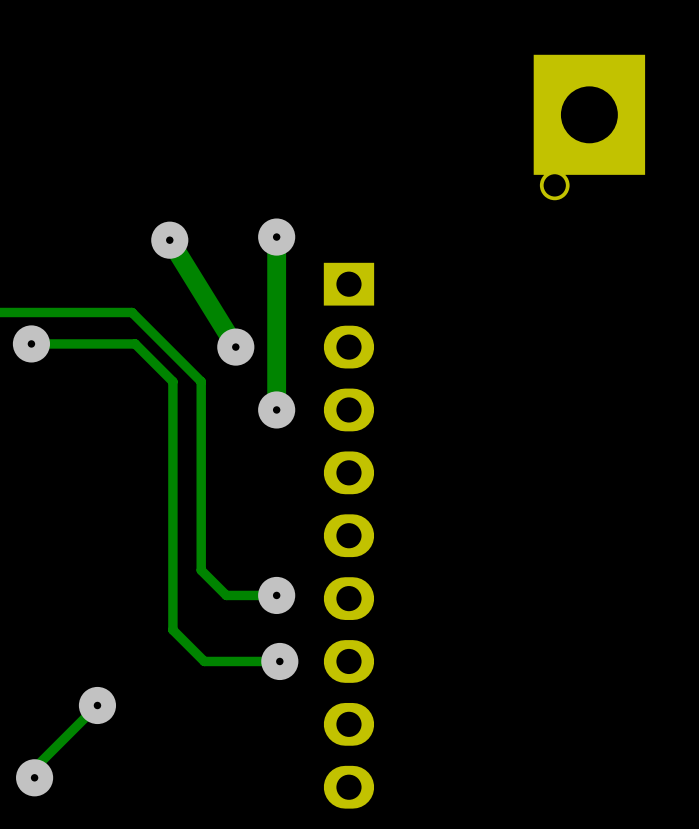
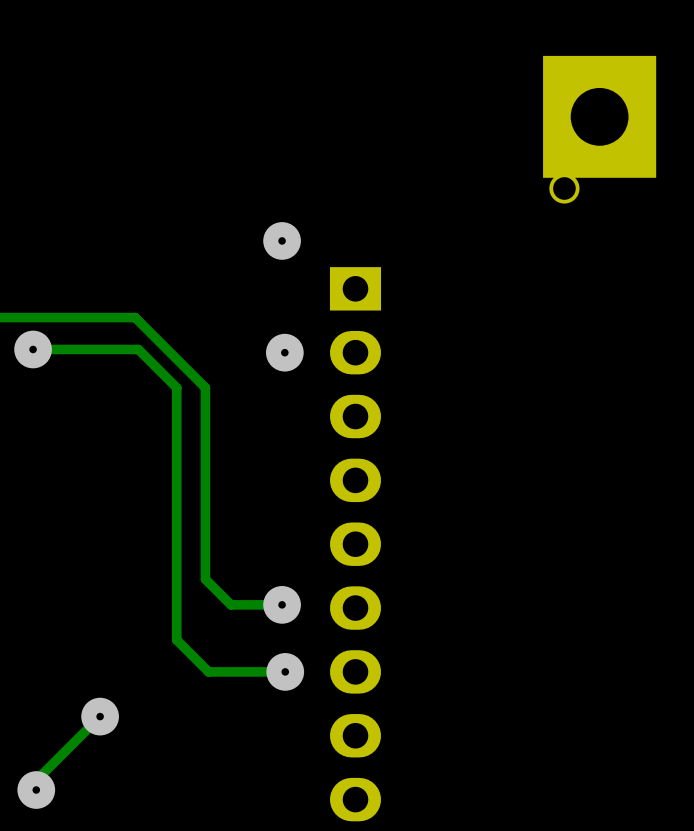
track: (276, 237) (276, 409) -> none
track: (169, 240) (235, 347) -> none
via: (169, 240) -> none
via: (235, 347) -> none
via: none -> (284, 352)
via: (276, 409) -> none

